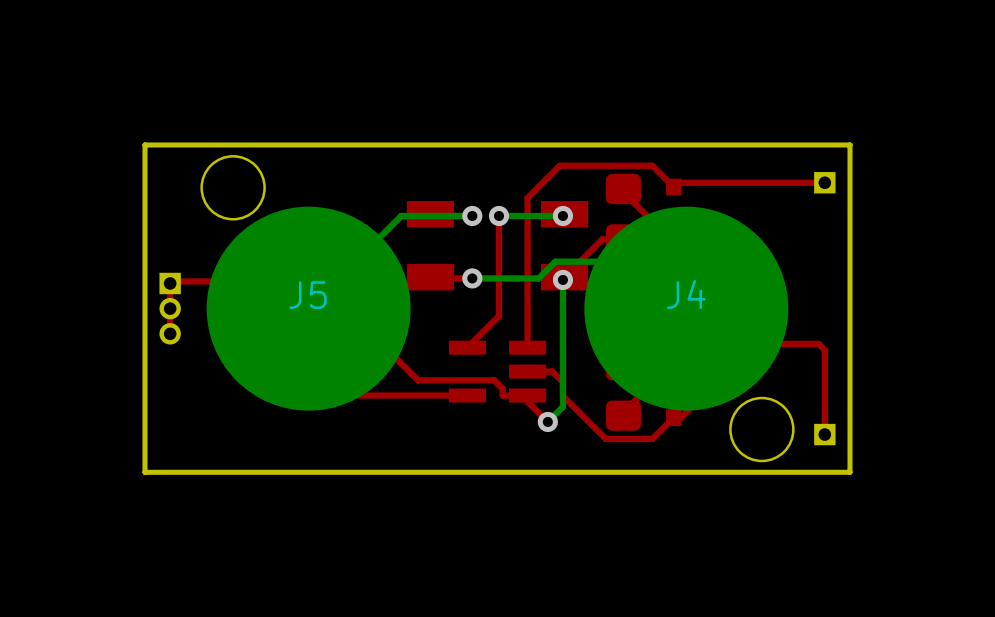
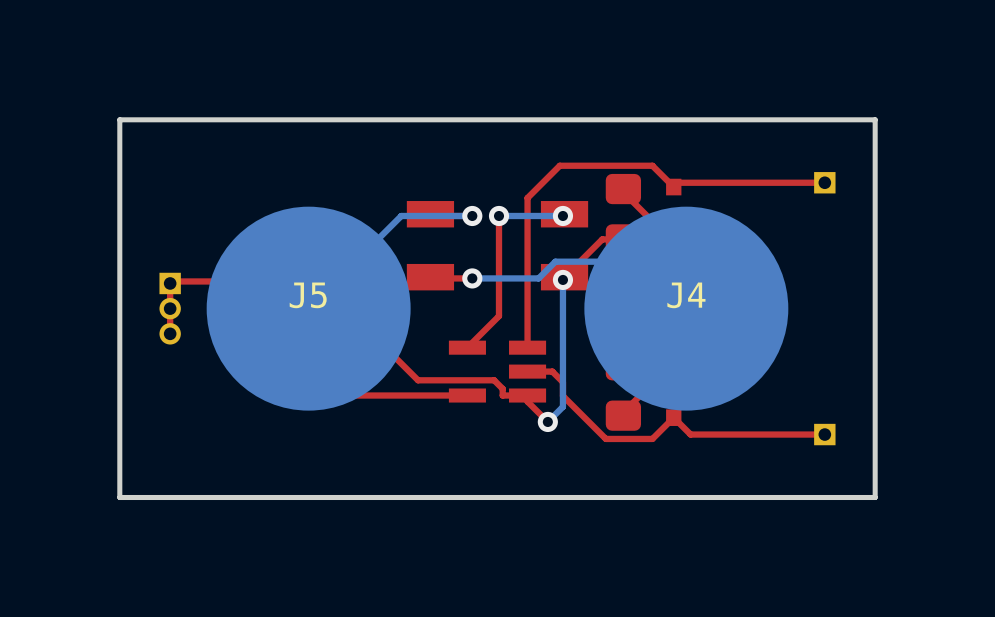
board edge: (850, 144) (144, 144) (144, 472) (850, 472) (850, 144) -> (875, 119) (875, 497) (119, 497) (119, 119) (875, 119)
round board edge: [200, 155, 266, 221] -> none
round board edge: [729, 396, 795, 463] -> none
top track: (673, 417) (681, 417) (754, 343) (818, 343) (824, 349) (824, 434) -> (673, 417) (690, 434) (824, 434)

